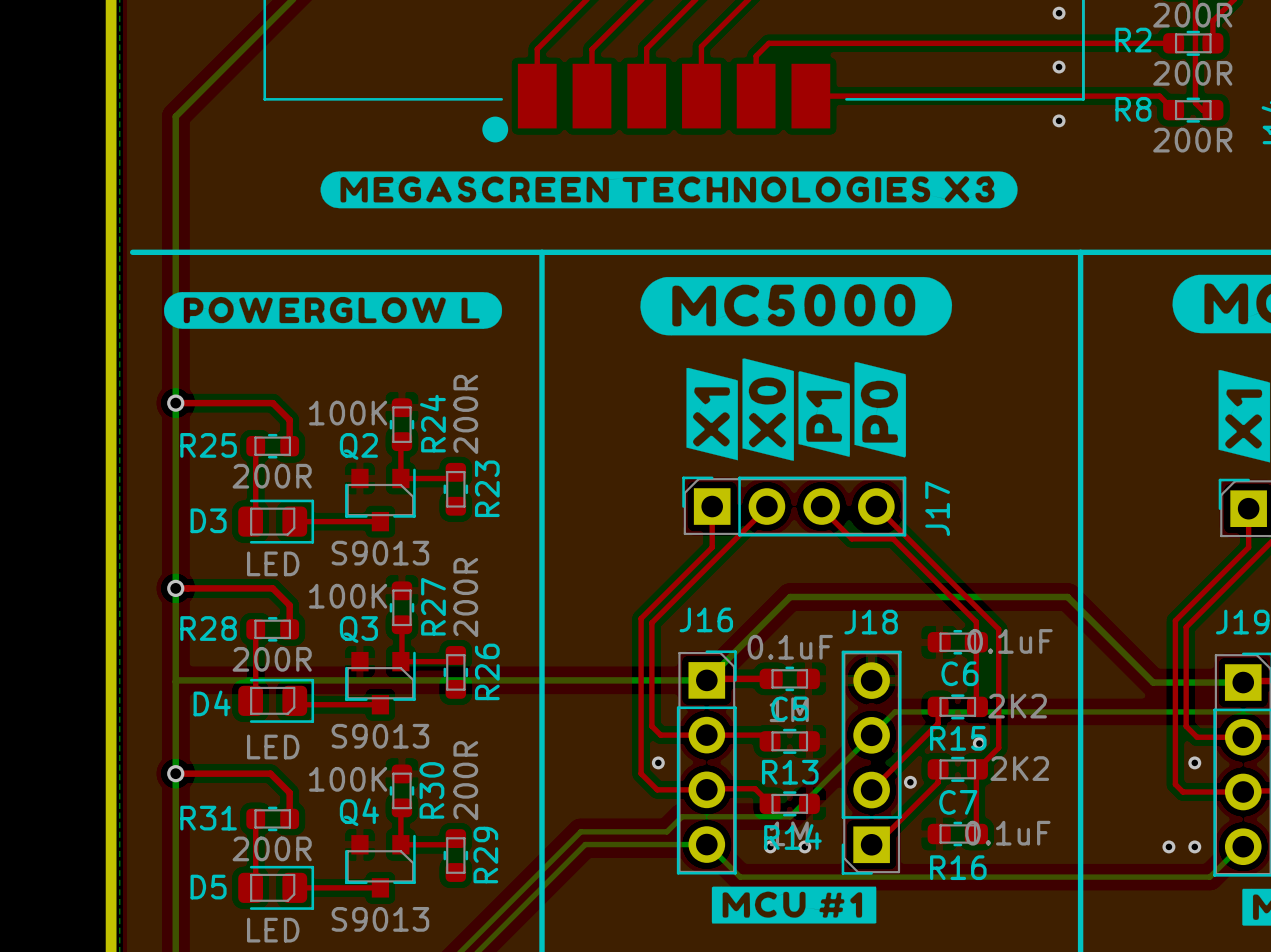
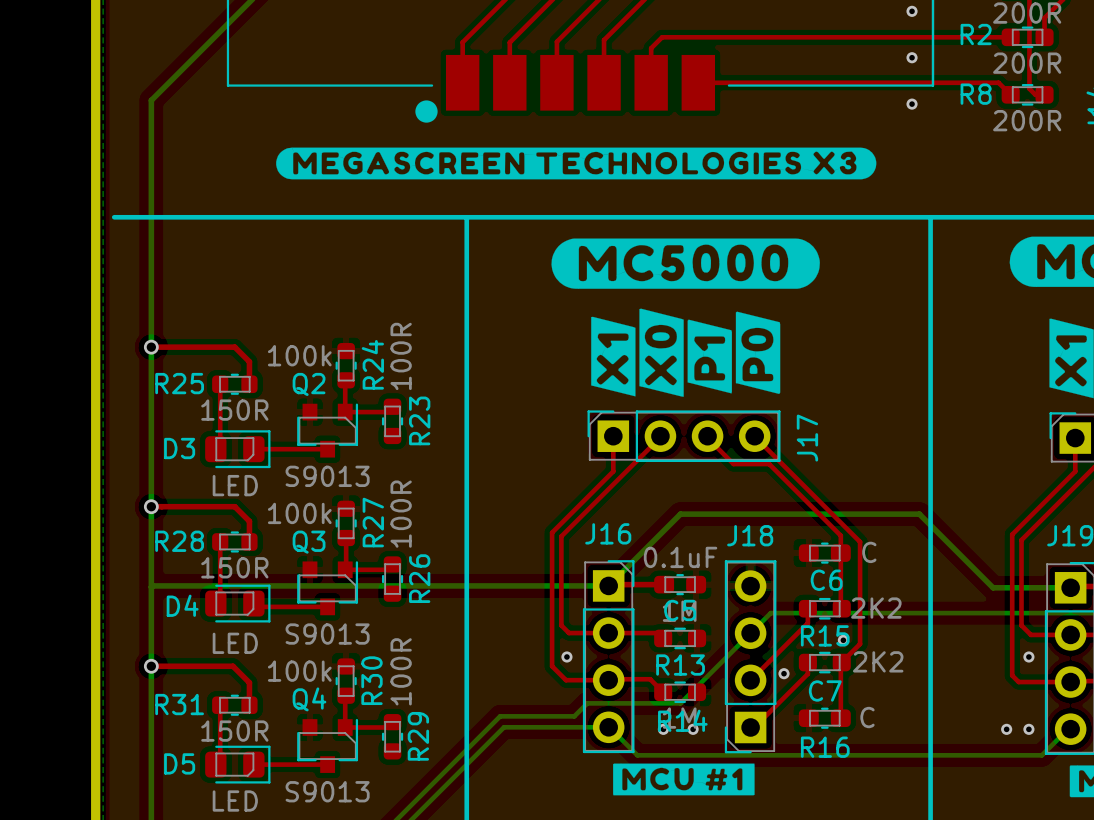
drawing: [164, 292, 503, 329] -> none
R24 value: 100K (348, 413) -> 100k (299, 355)
R23 value: 200R (465, 414) -> 100R (401, 356)
R25 value: 200R (272, 476) -> 150R (234, 410)
R27 value: 100K (348, 596) -> 100k (299, 513)
R26 value: 200R (465, 597) -> 100R (401, 514)
C6 value: 0.1uF (1010, 641) -> C (869, 552)
R28 value: 200R (272, 659) -> 150R (234, 567)
R30 value: 100K (348, 779) -> 100k (299, 671)
R29 value: 200R (465, 780) -> 100R (401, 671)
C7 value: 0.1uF (1007, 833) -> C (867, 717)
R31 value: 200R (272, 848) -> 150R (234, 731)

